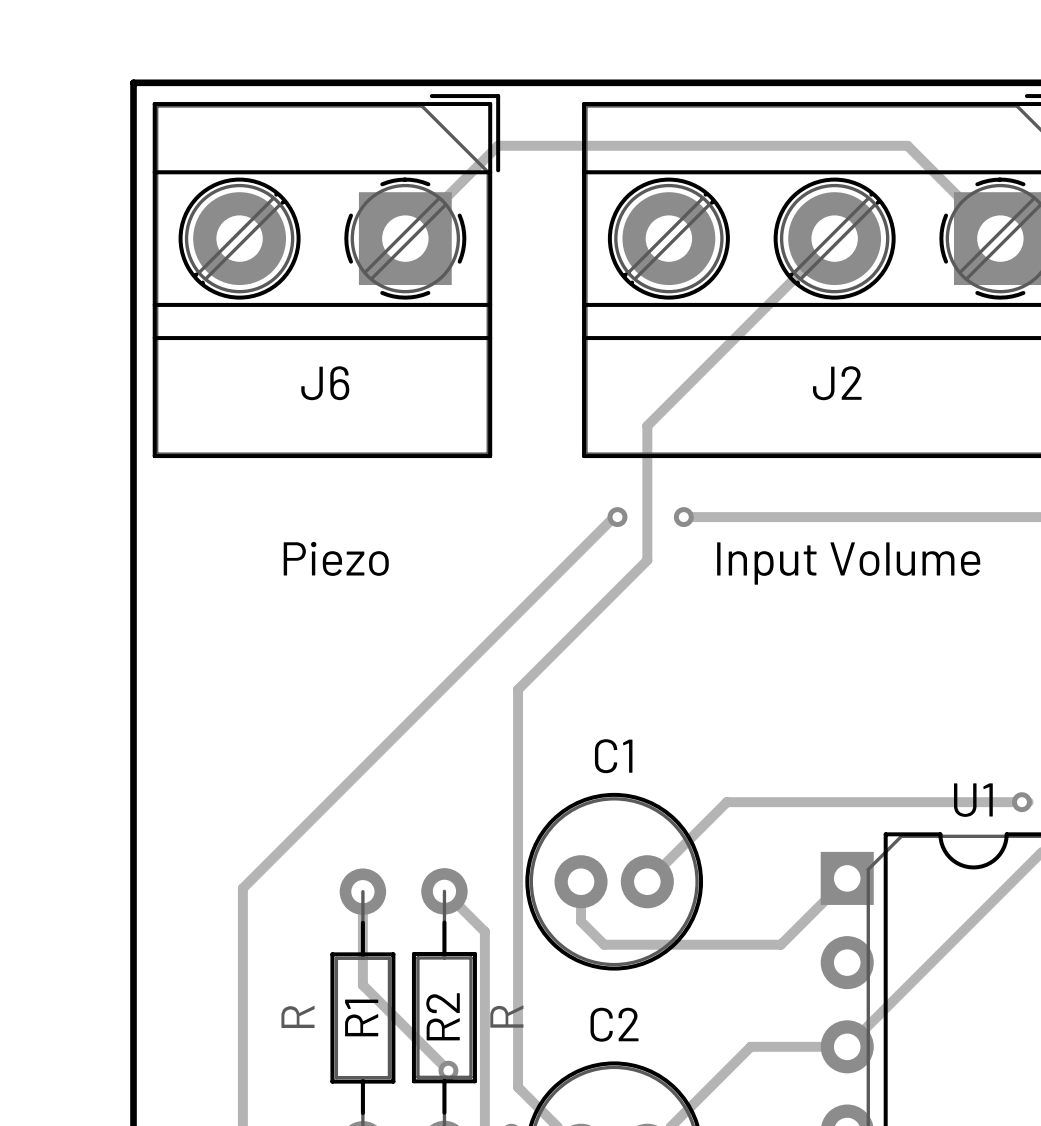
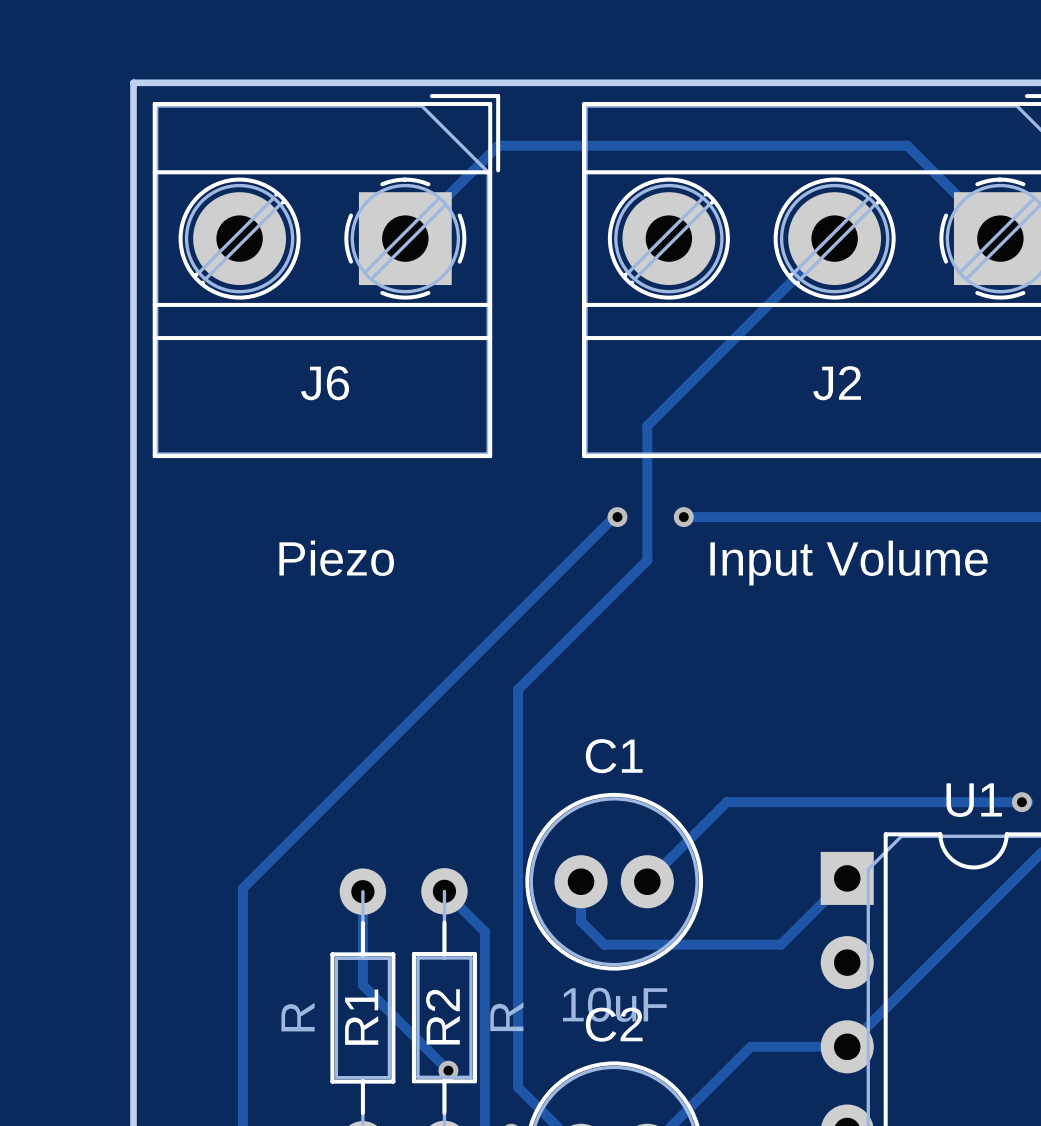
C1 value: none -> 10uF (615, 1004)

